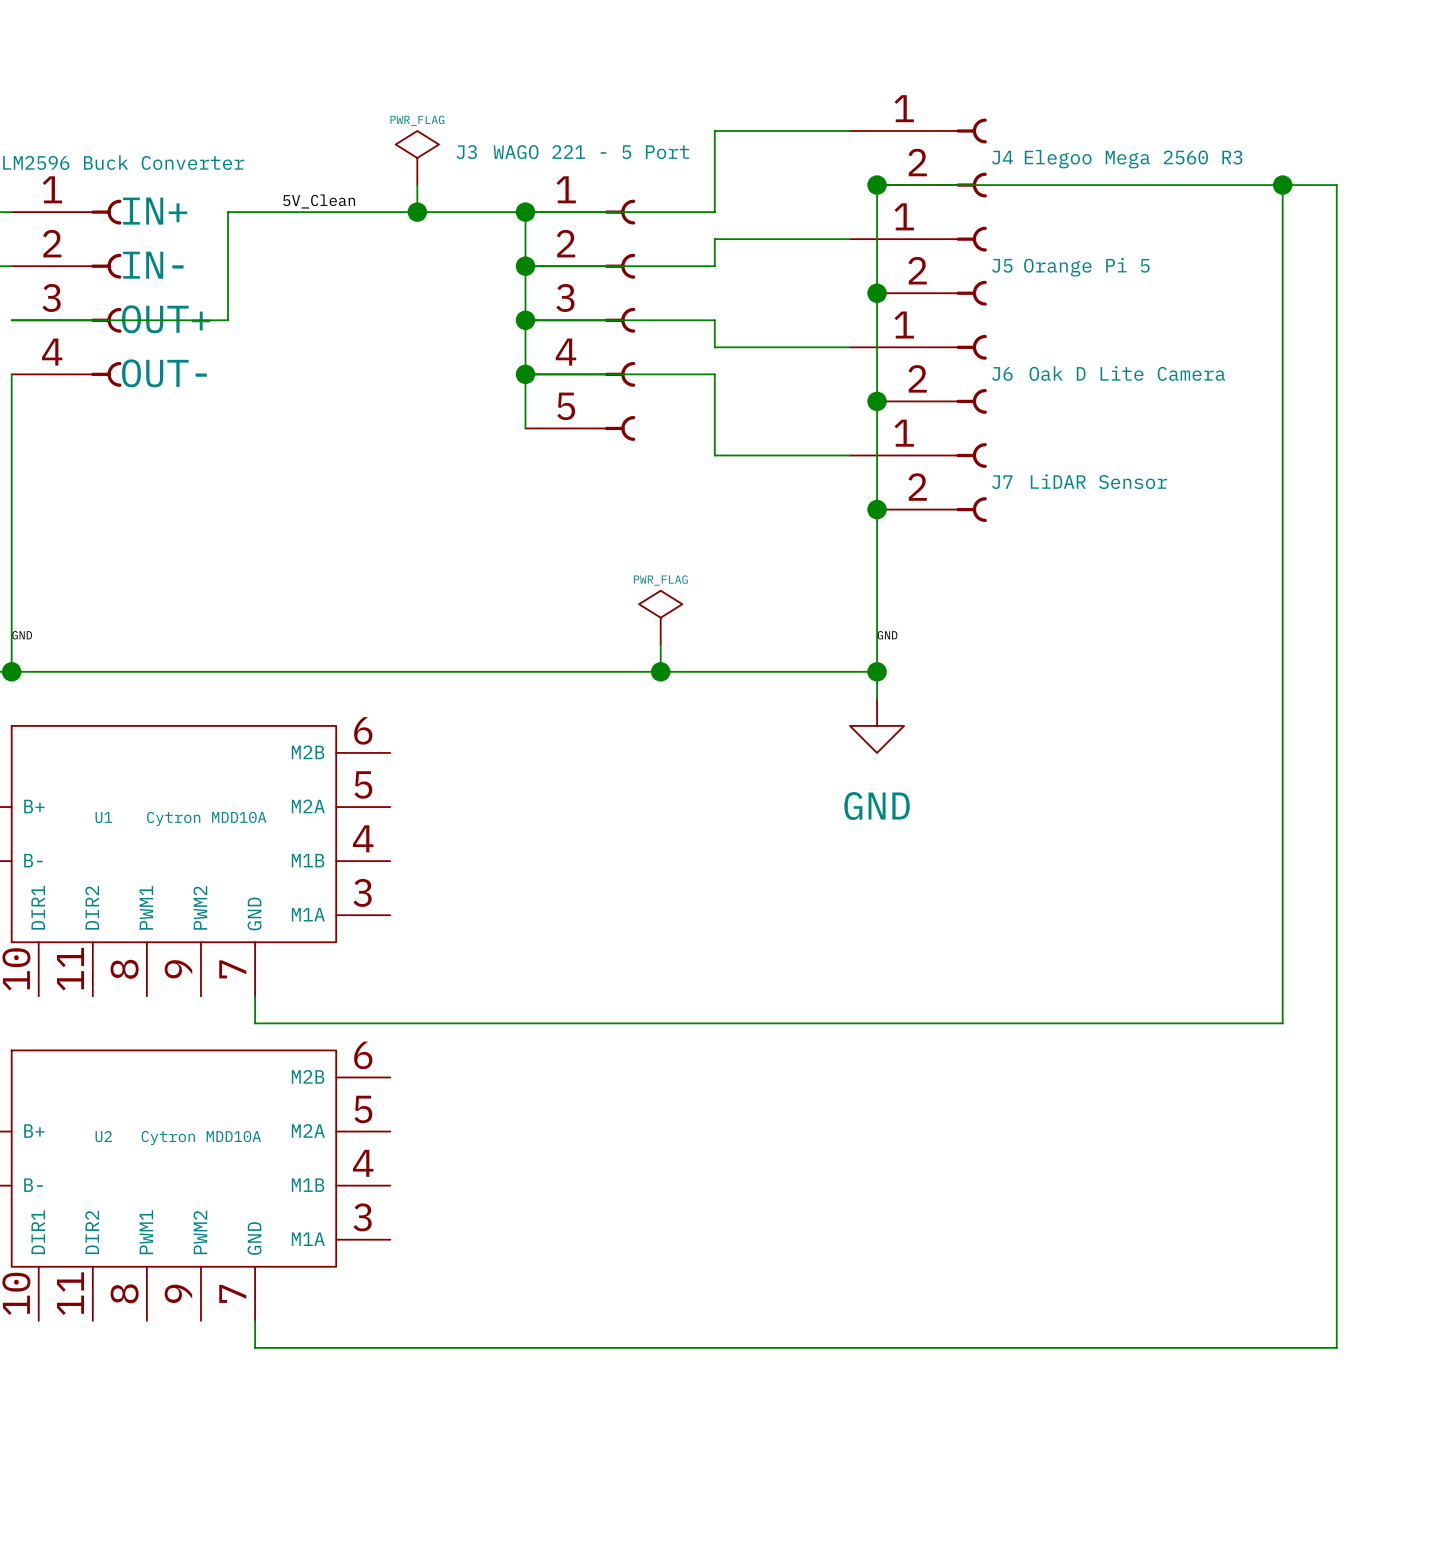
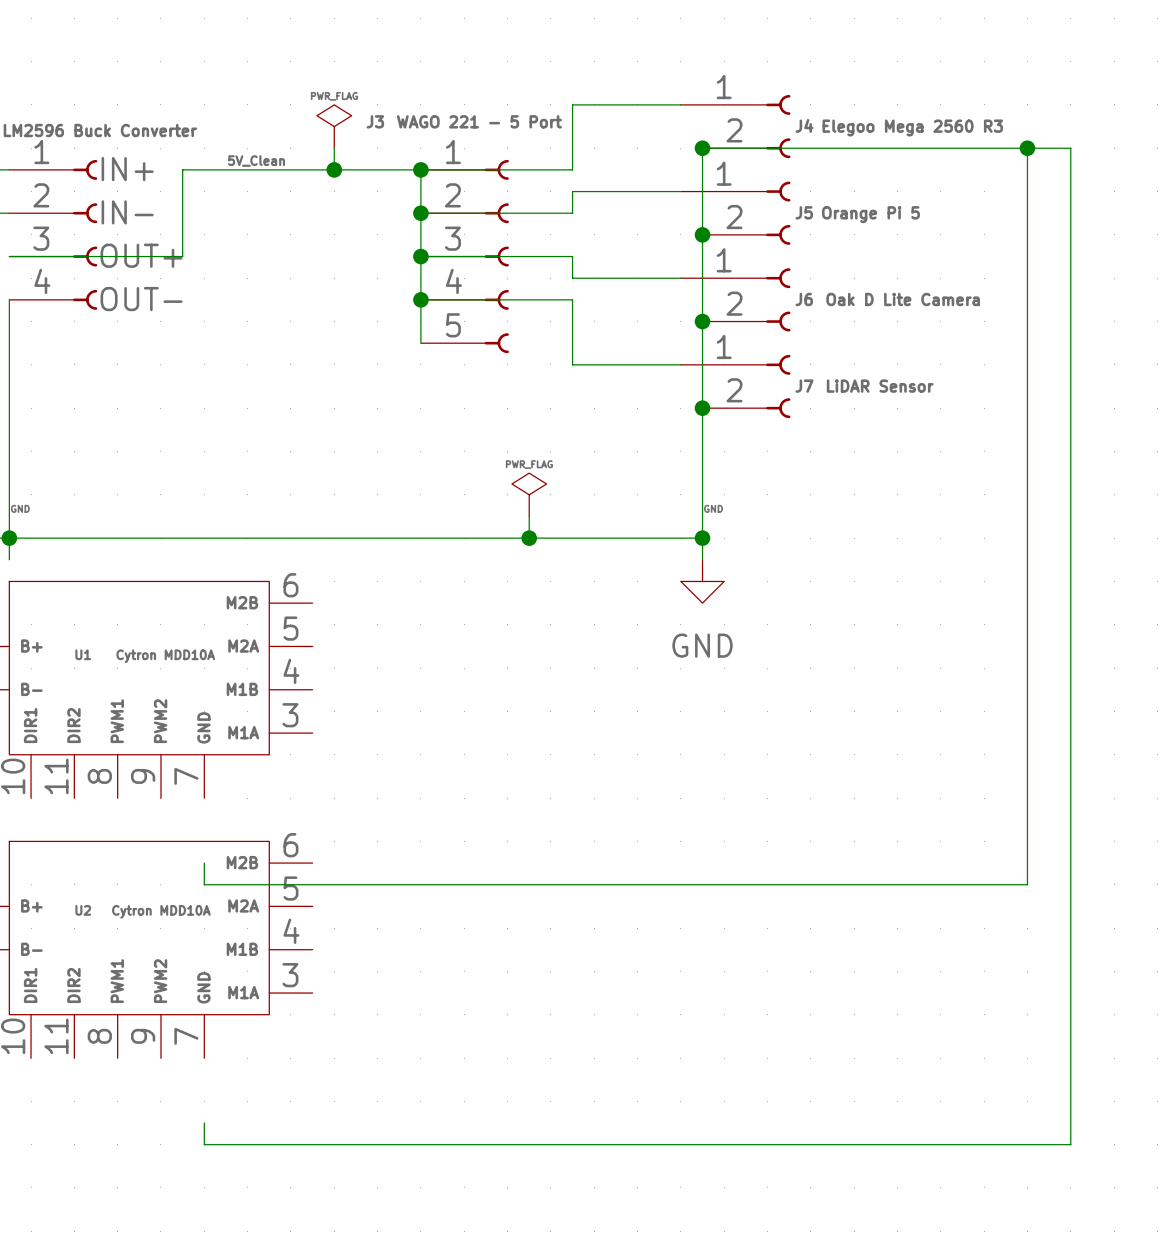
wire: none -> (9, 538) (9, 559)
wire: (255, 996) (255, 1023) (1282, 1023) -> (204, 863) (204, 884) (1027, 884) (1027, 819)
wire: (255, 1320) (255, 1347) (1336, 1347) -> (204, 1122) (204, 1144) (1070, 1144) (1070, 1079)

